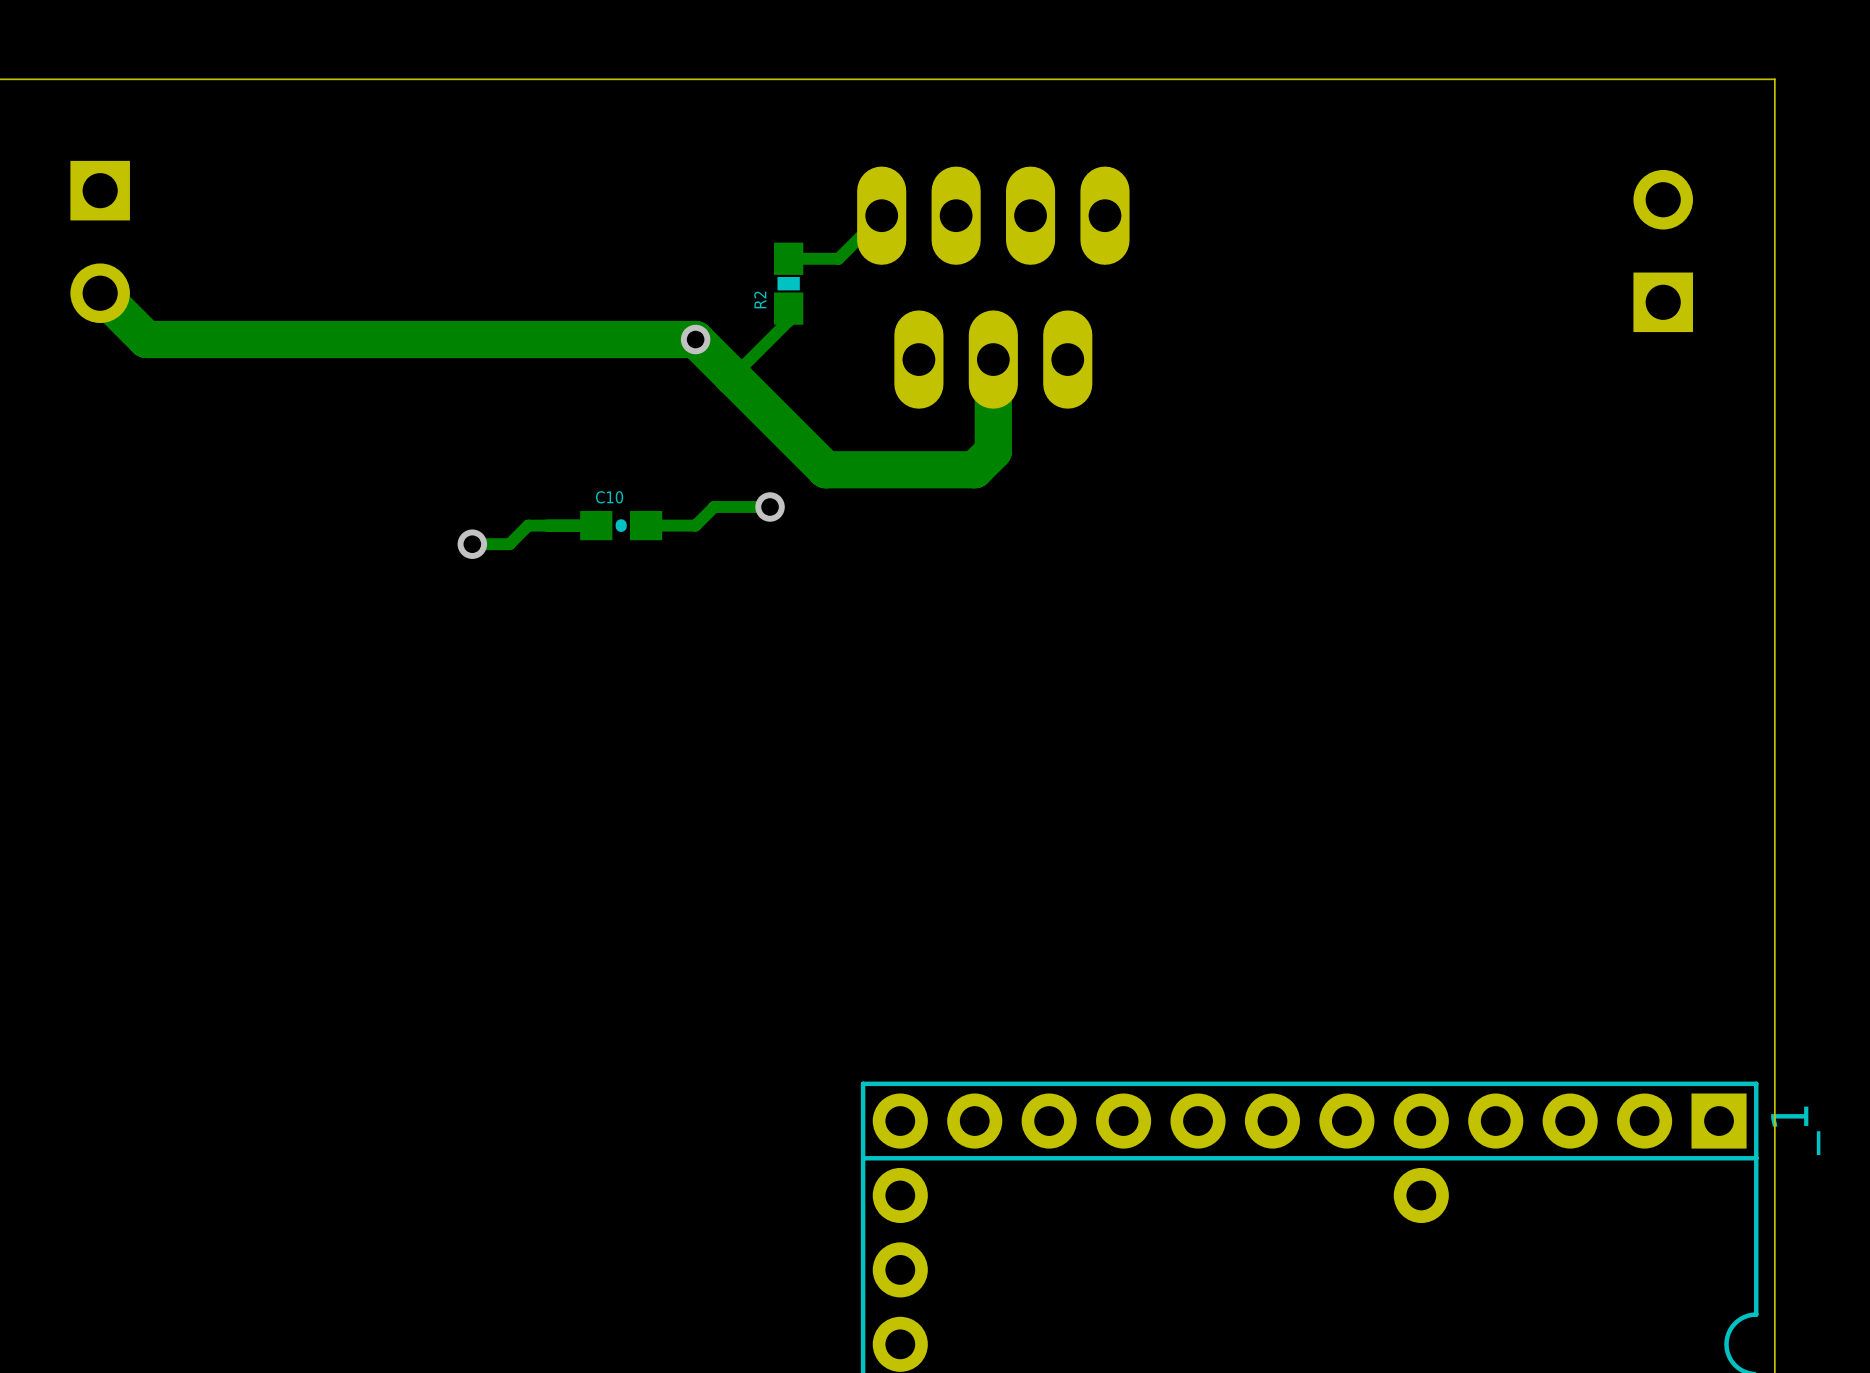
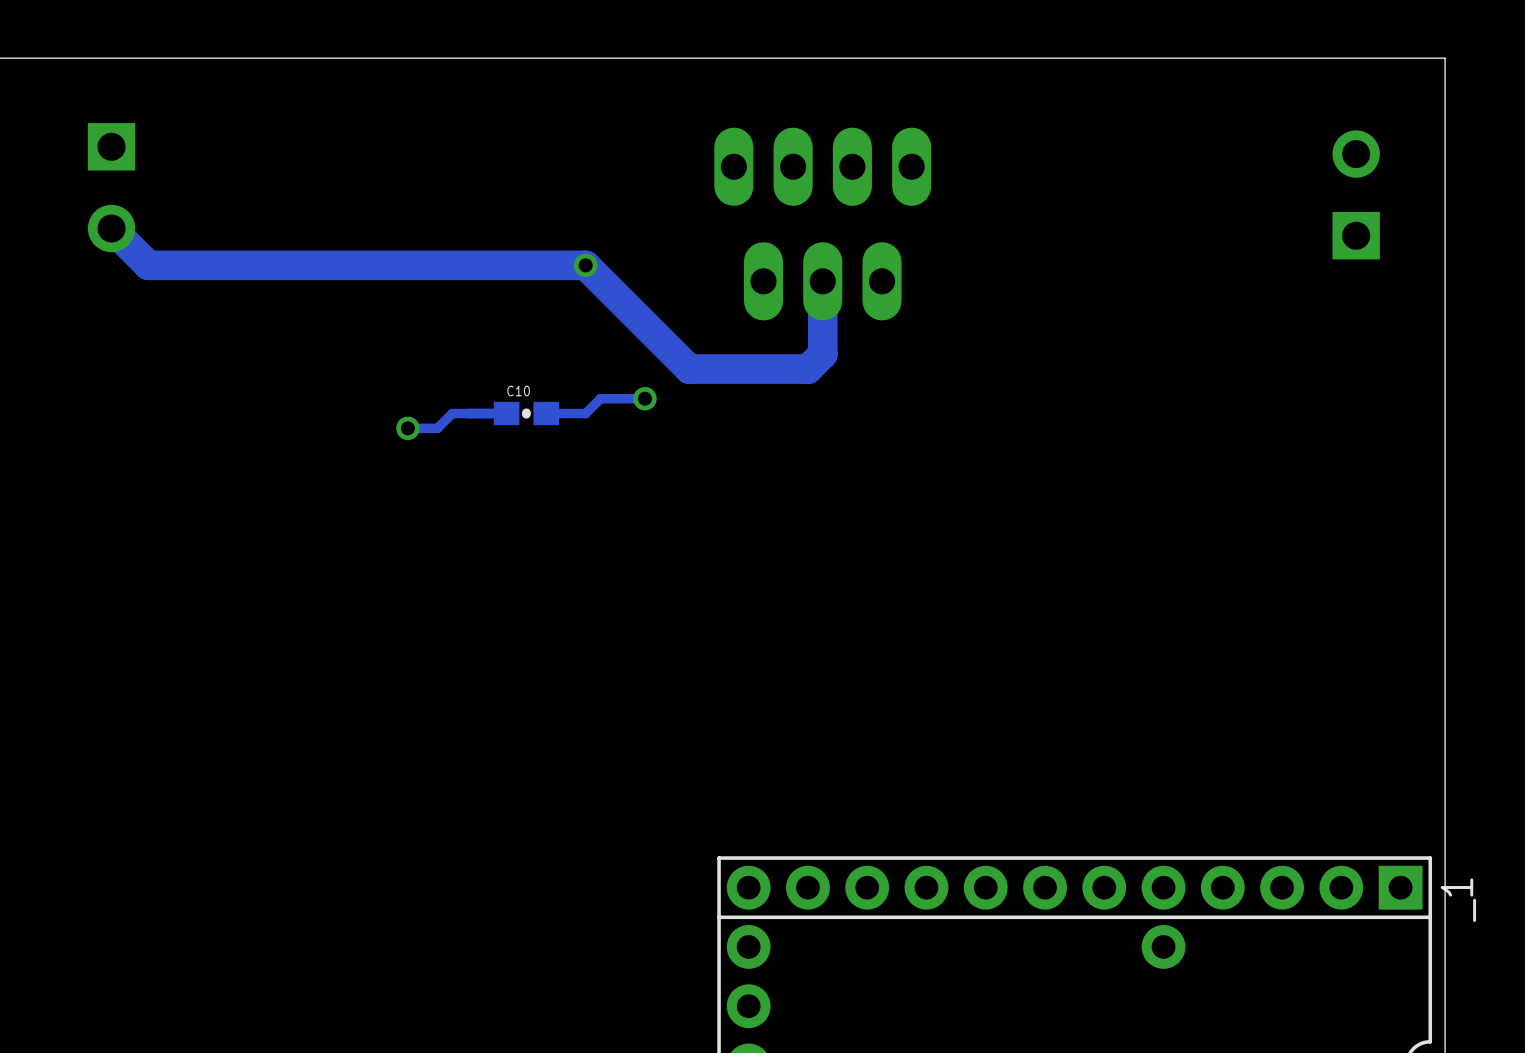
track: (881, 215) (838, 258) (788, 258) -> none
R2: (788, 283) -> none
track: (788, 308) (788, 320) (732, 376) -> none

